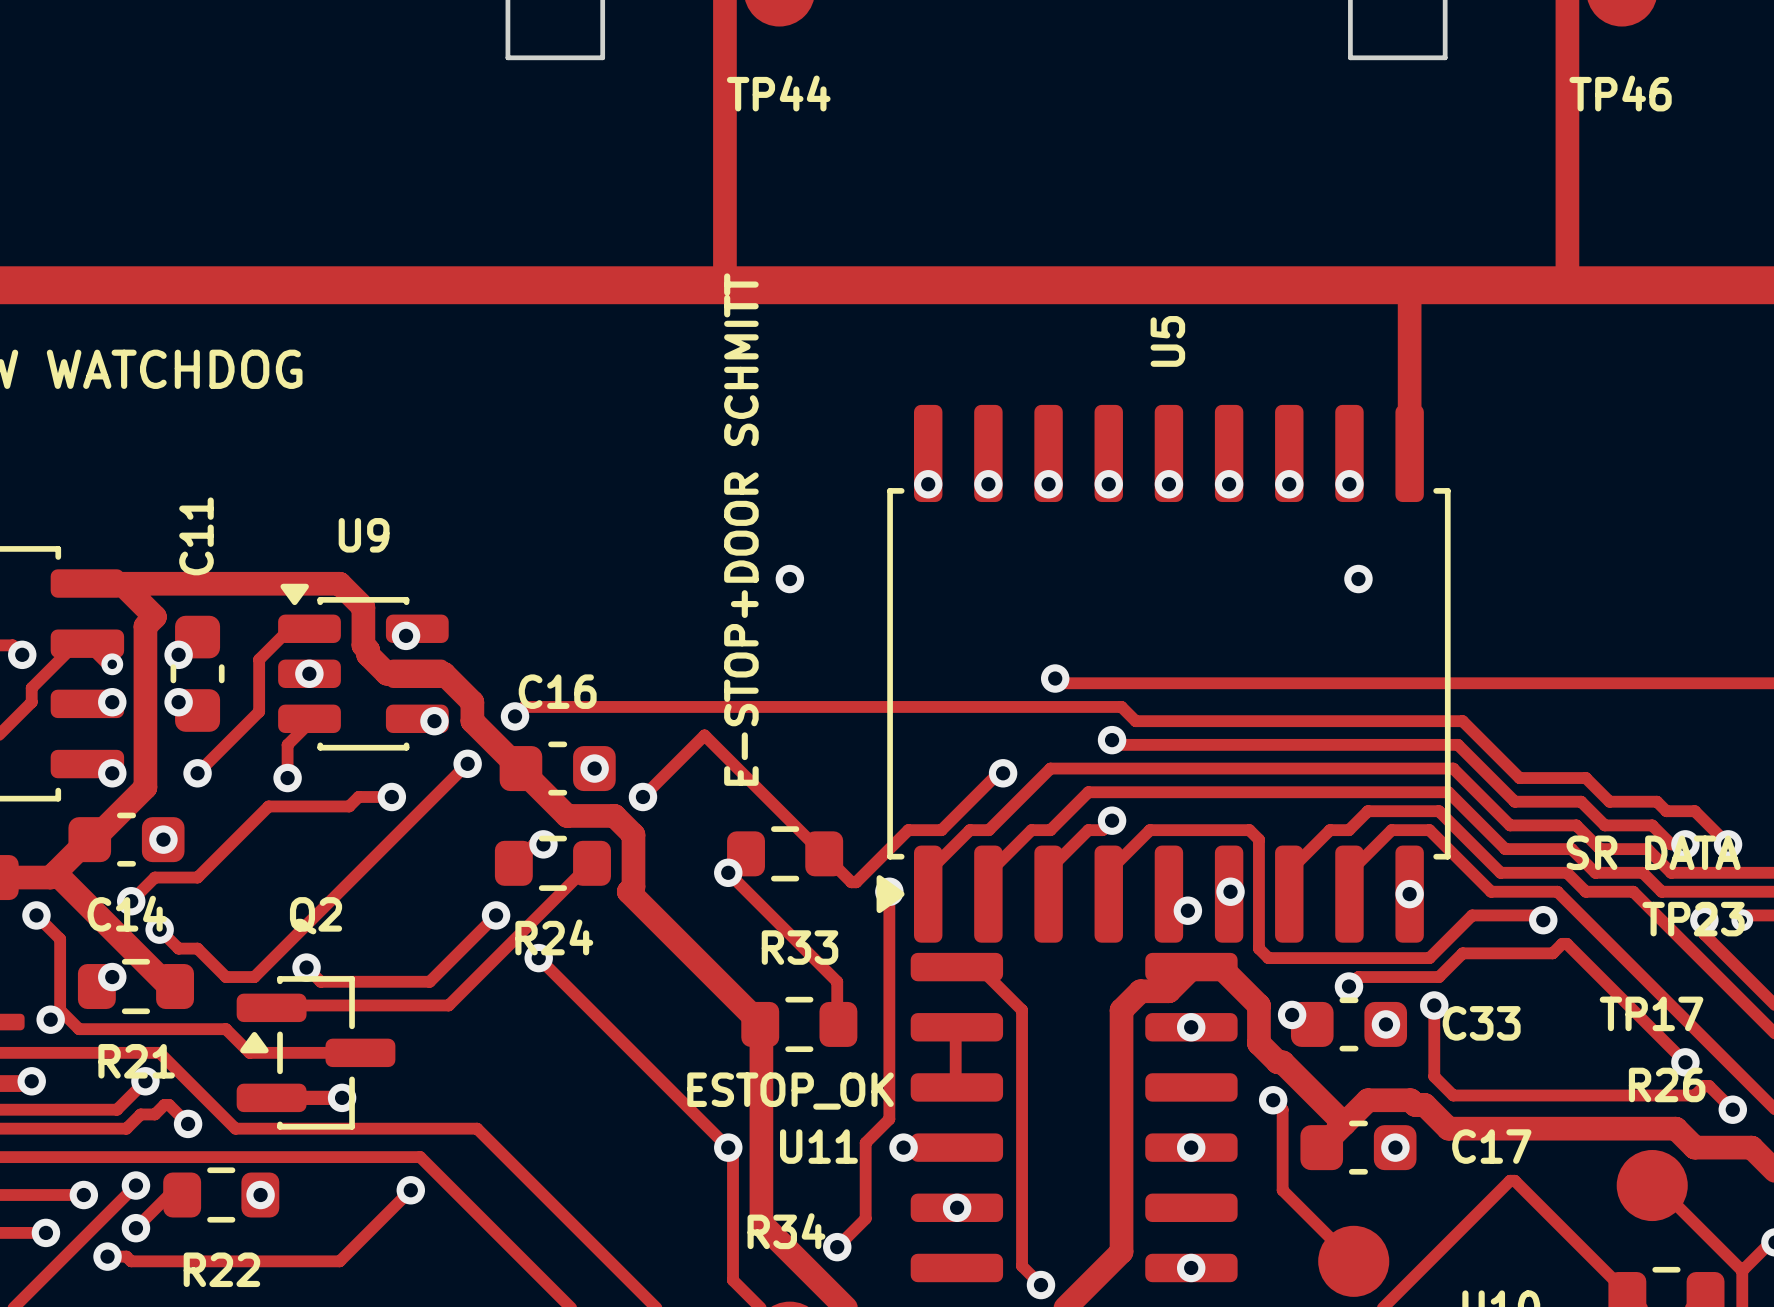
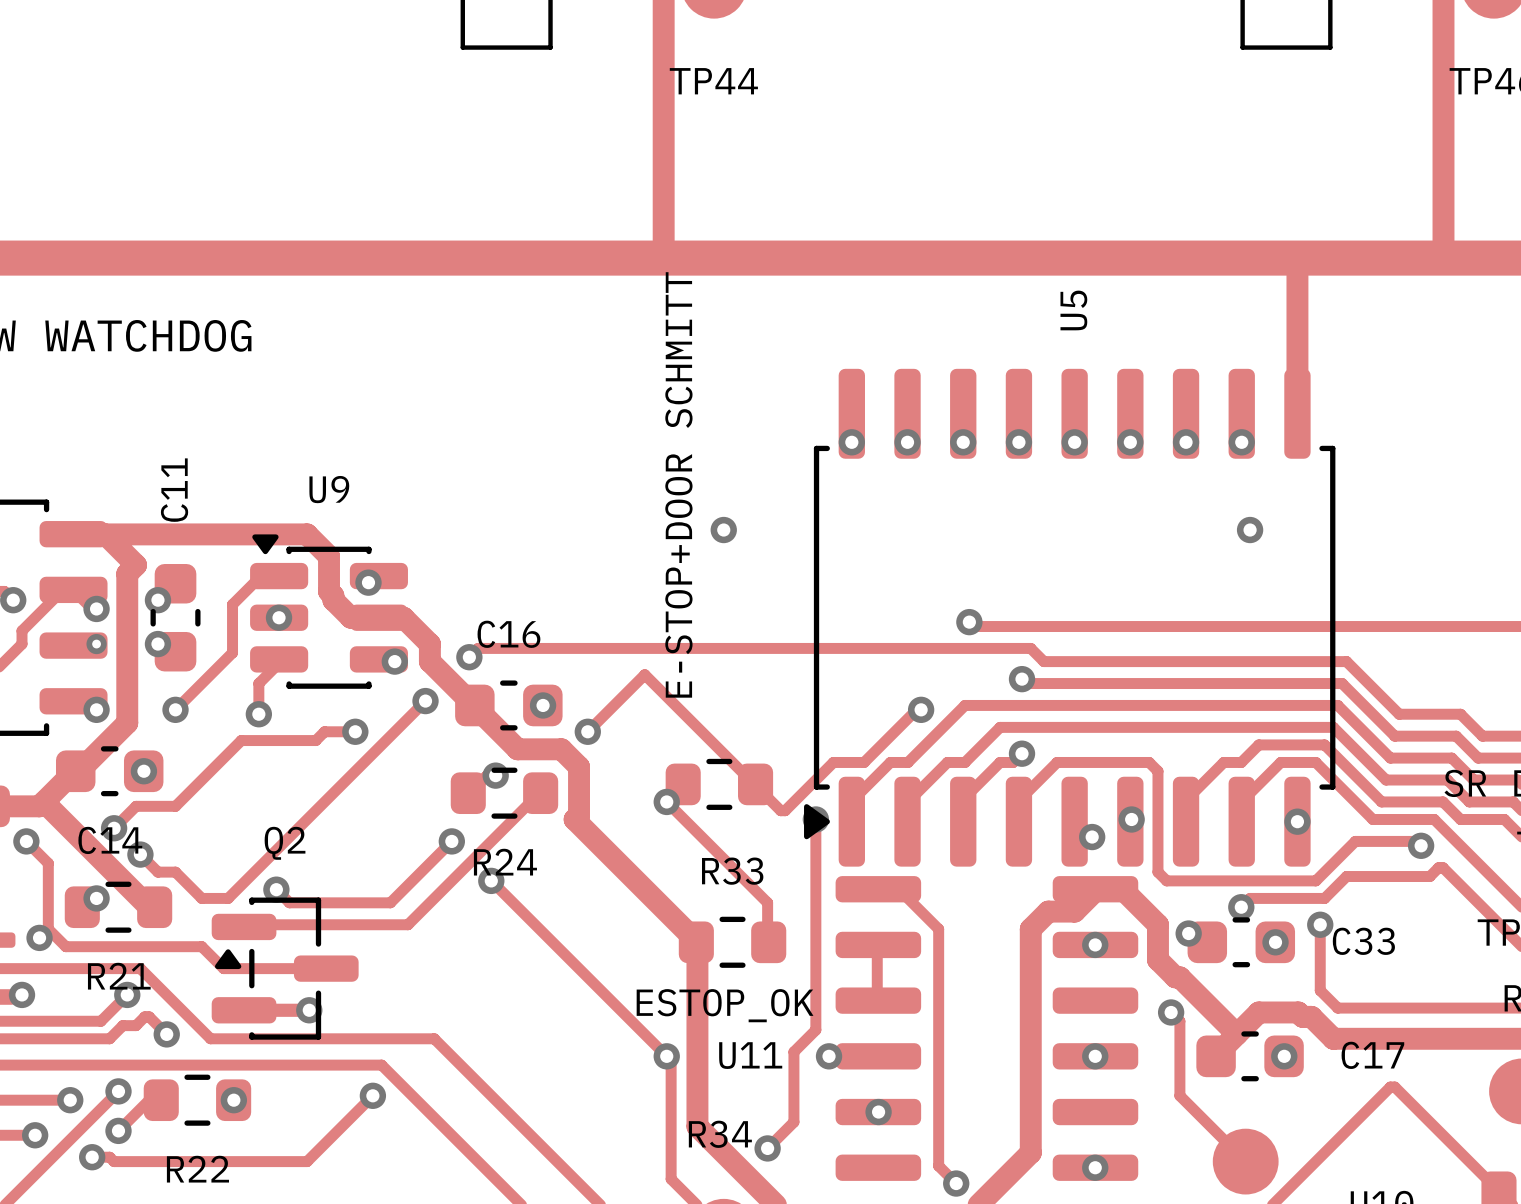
via position: (112, 664) -> (96, 644)
via position: (112, 702) -> (96, 608)

